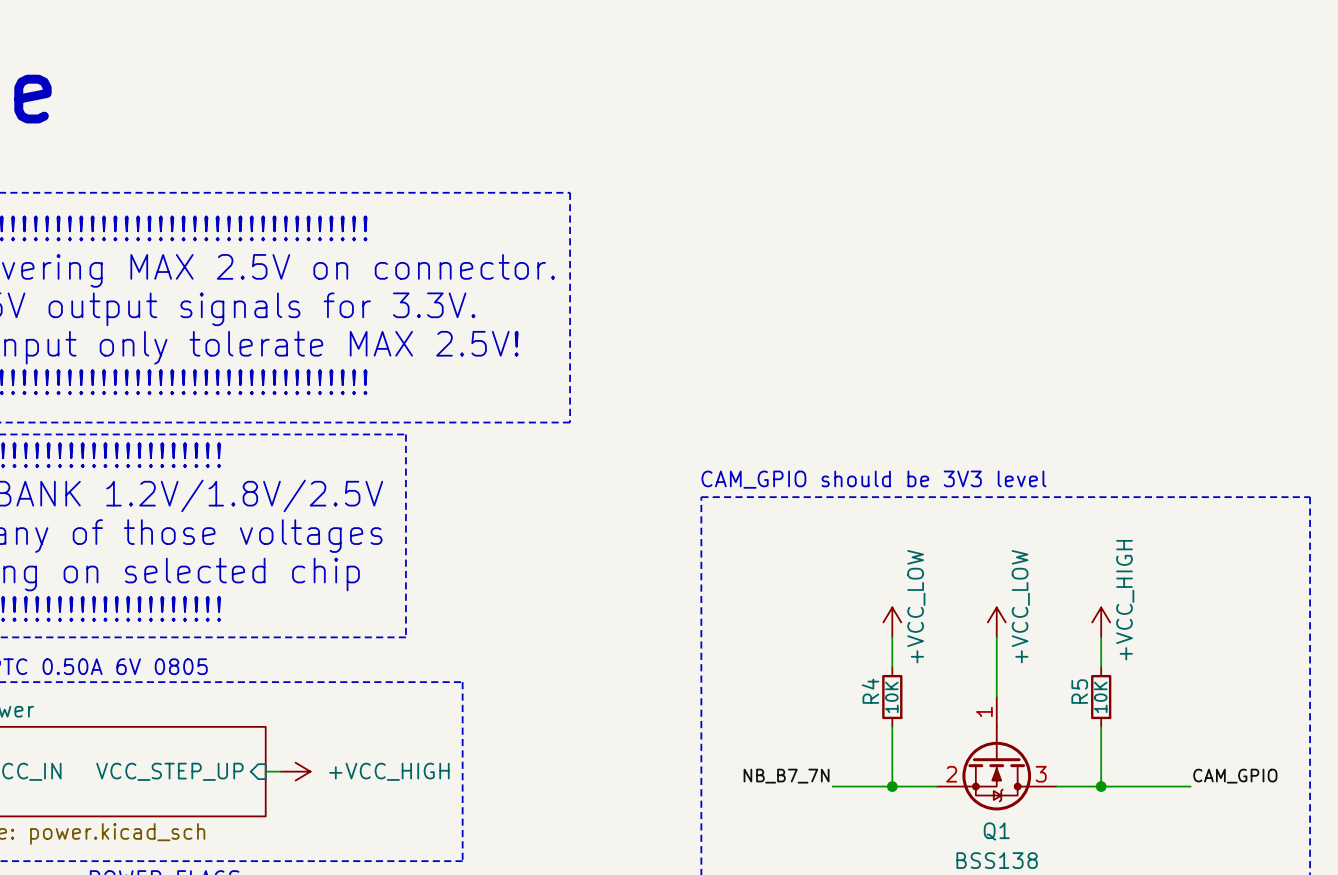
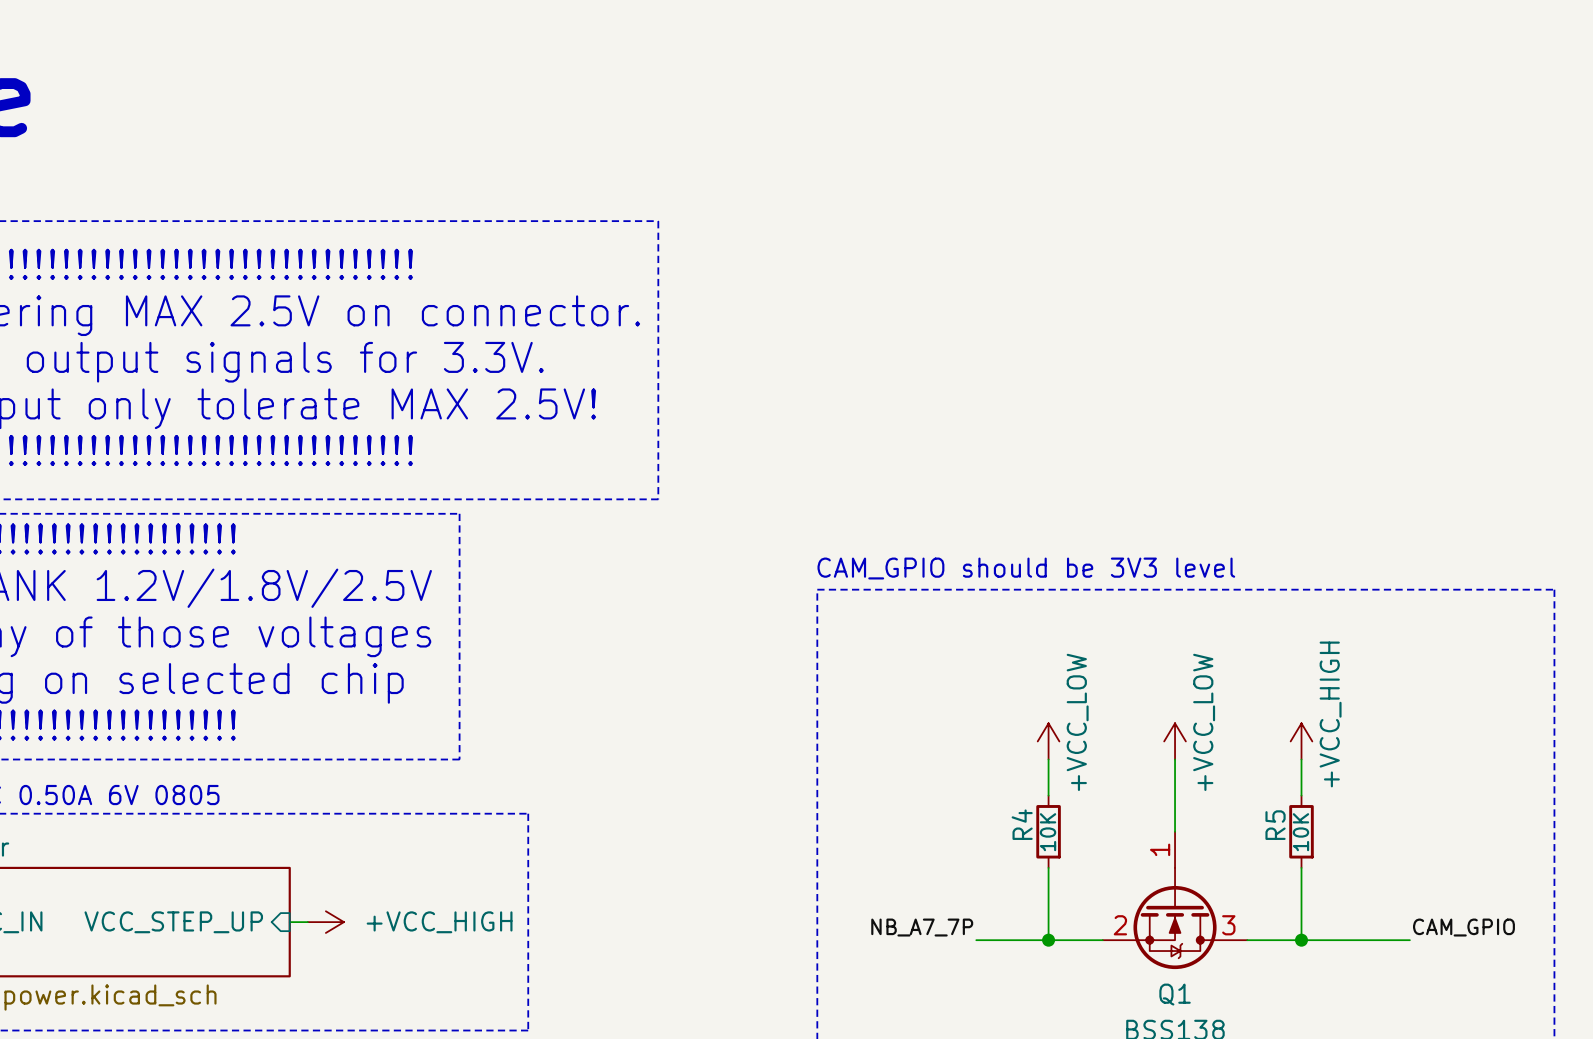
label: NB_B7_7N (786, 776) -> NB_A7_7P (922, 927)

